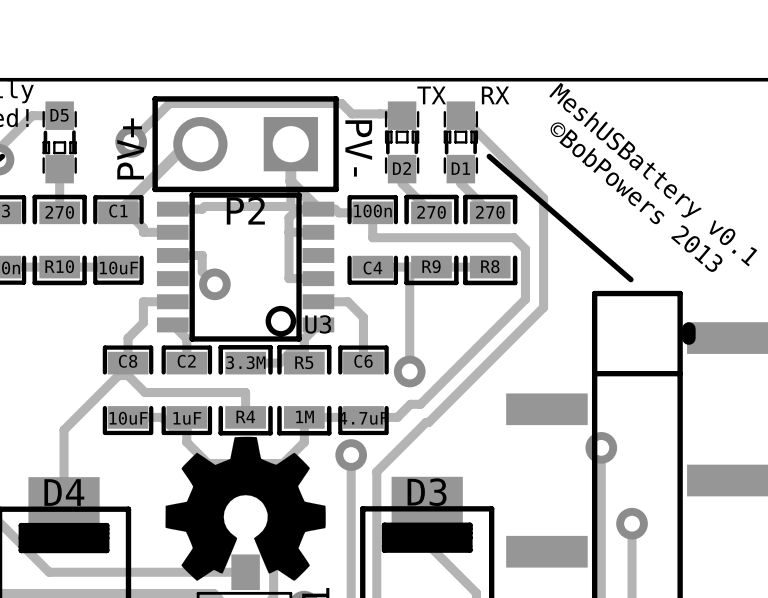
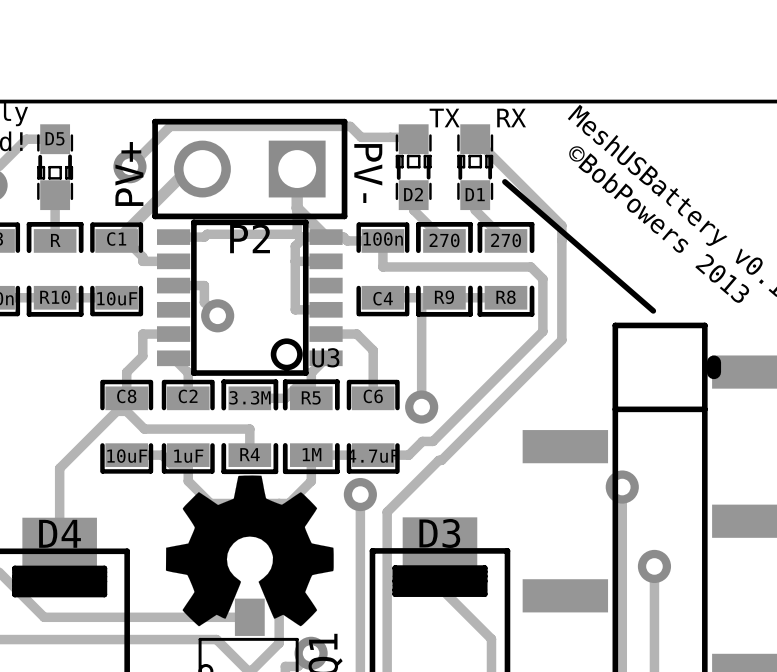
R10 value: 270 (59, 212) -> R (55, 240)

